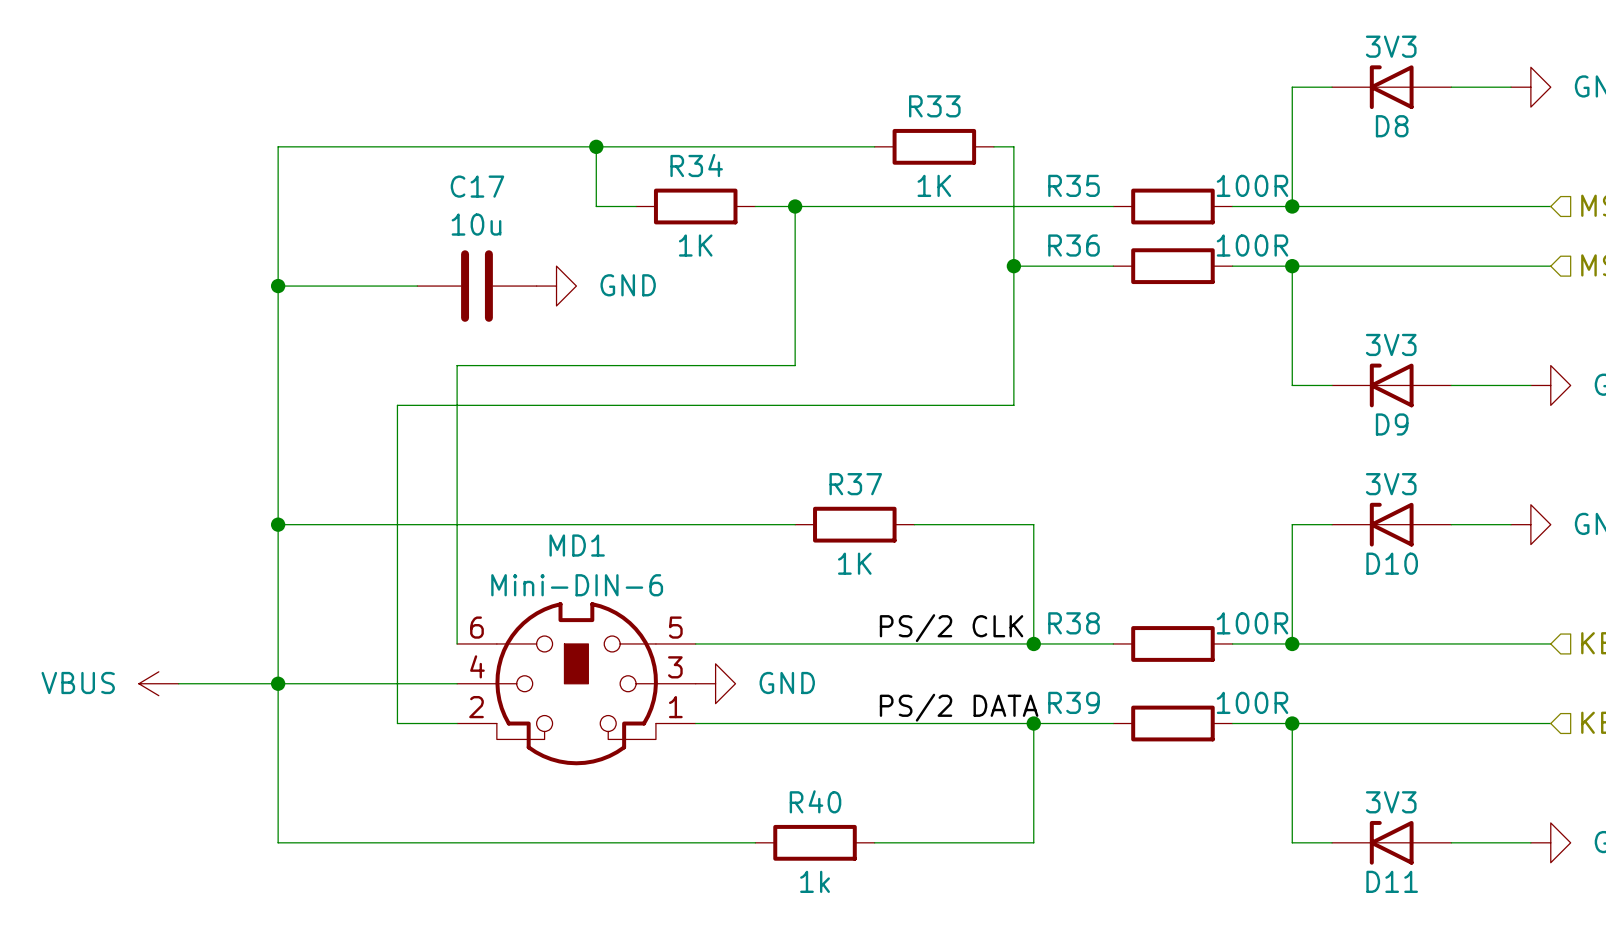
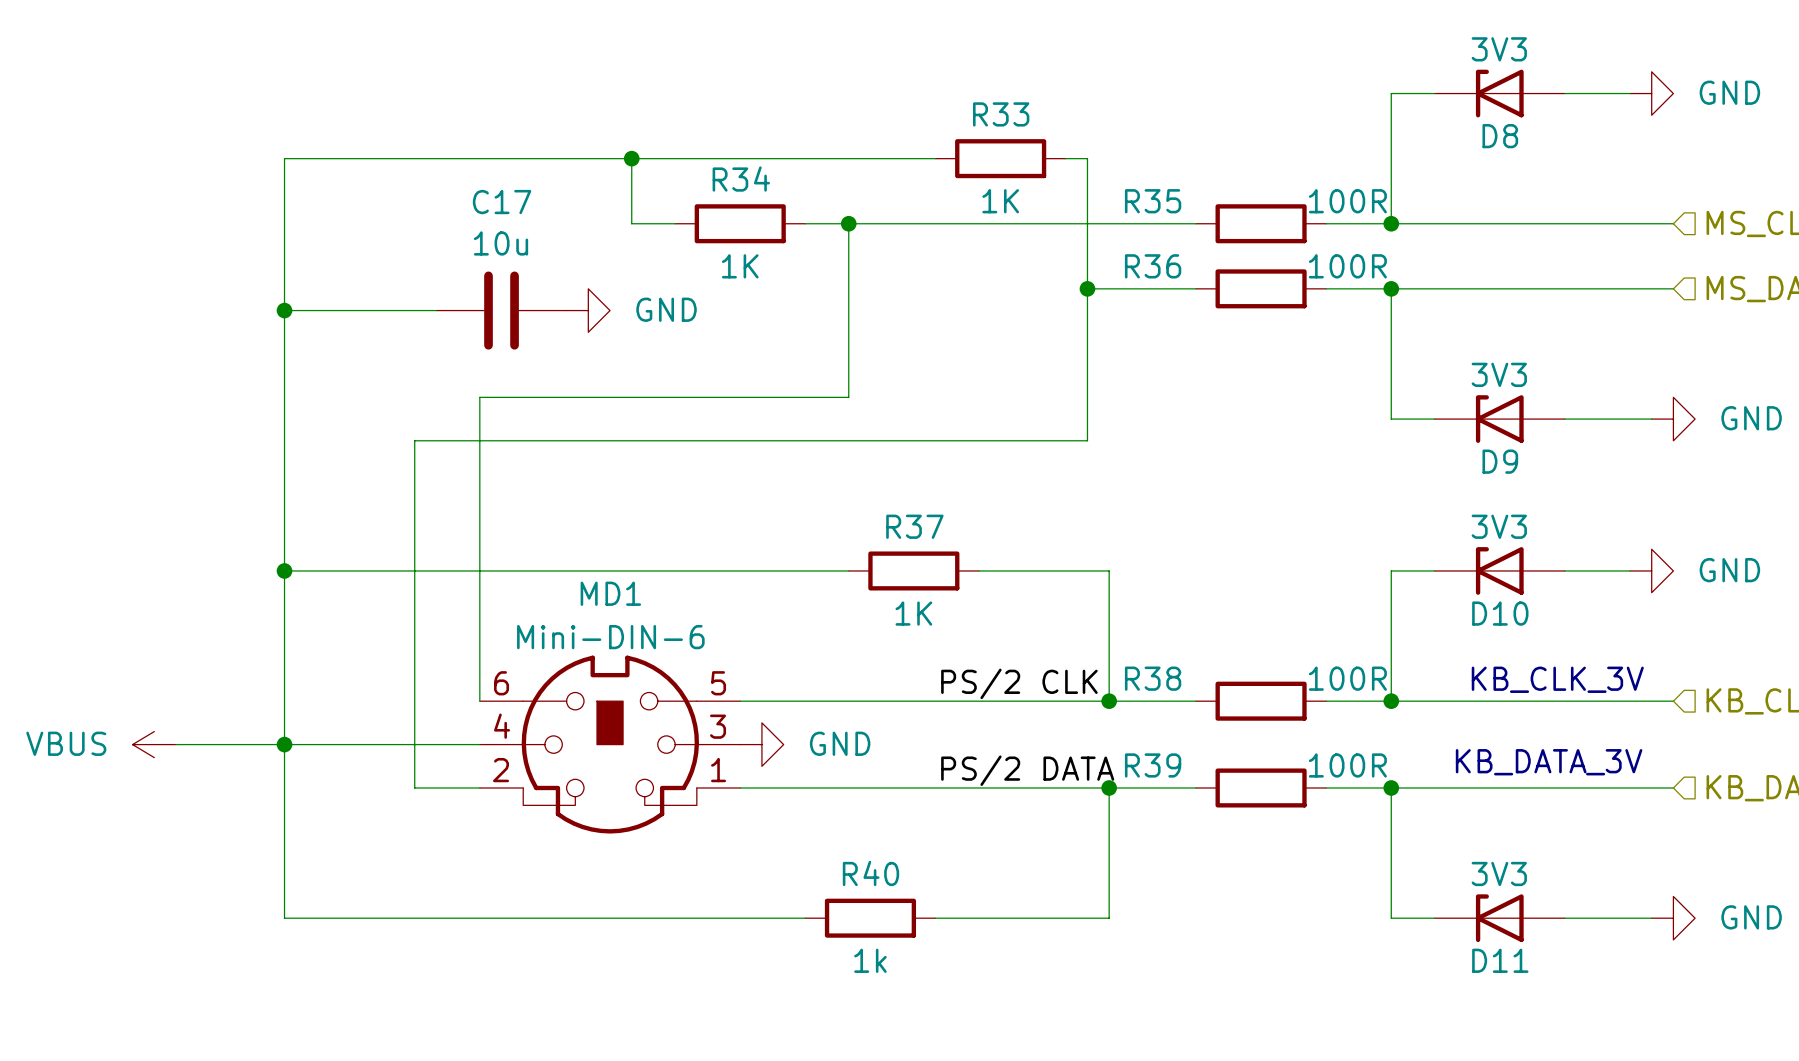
text: none -> KB_CLK_3V (1557, 679)
text: none -> KB_DATA_3V (1549, 762)

